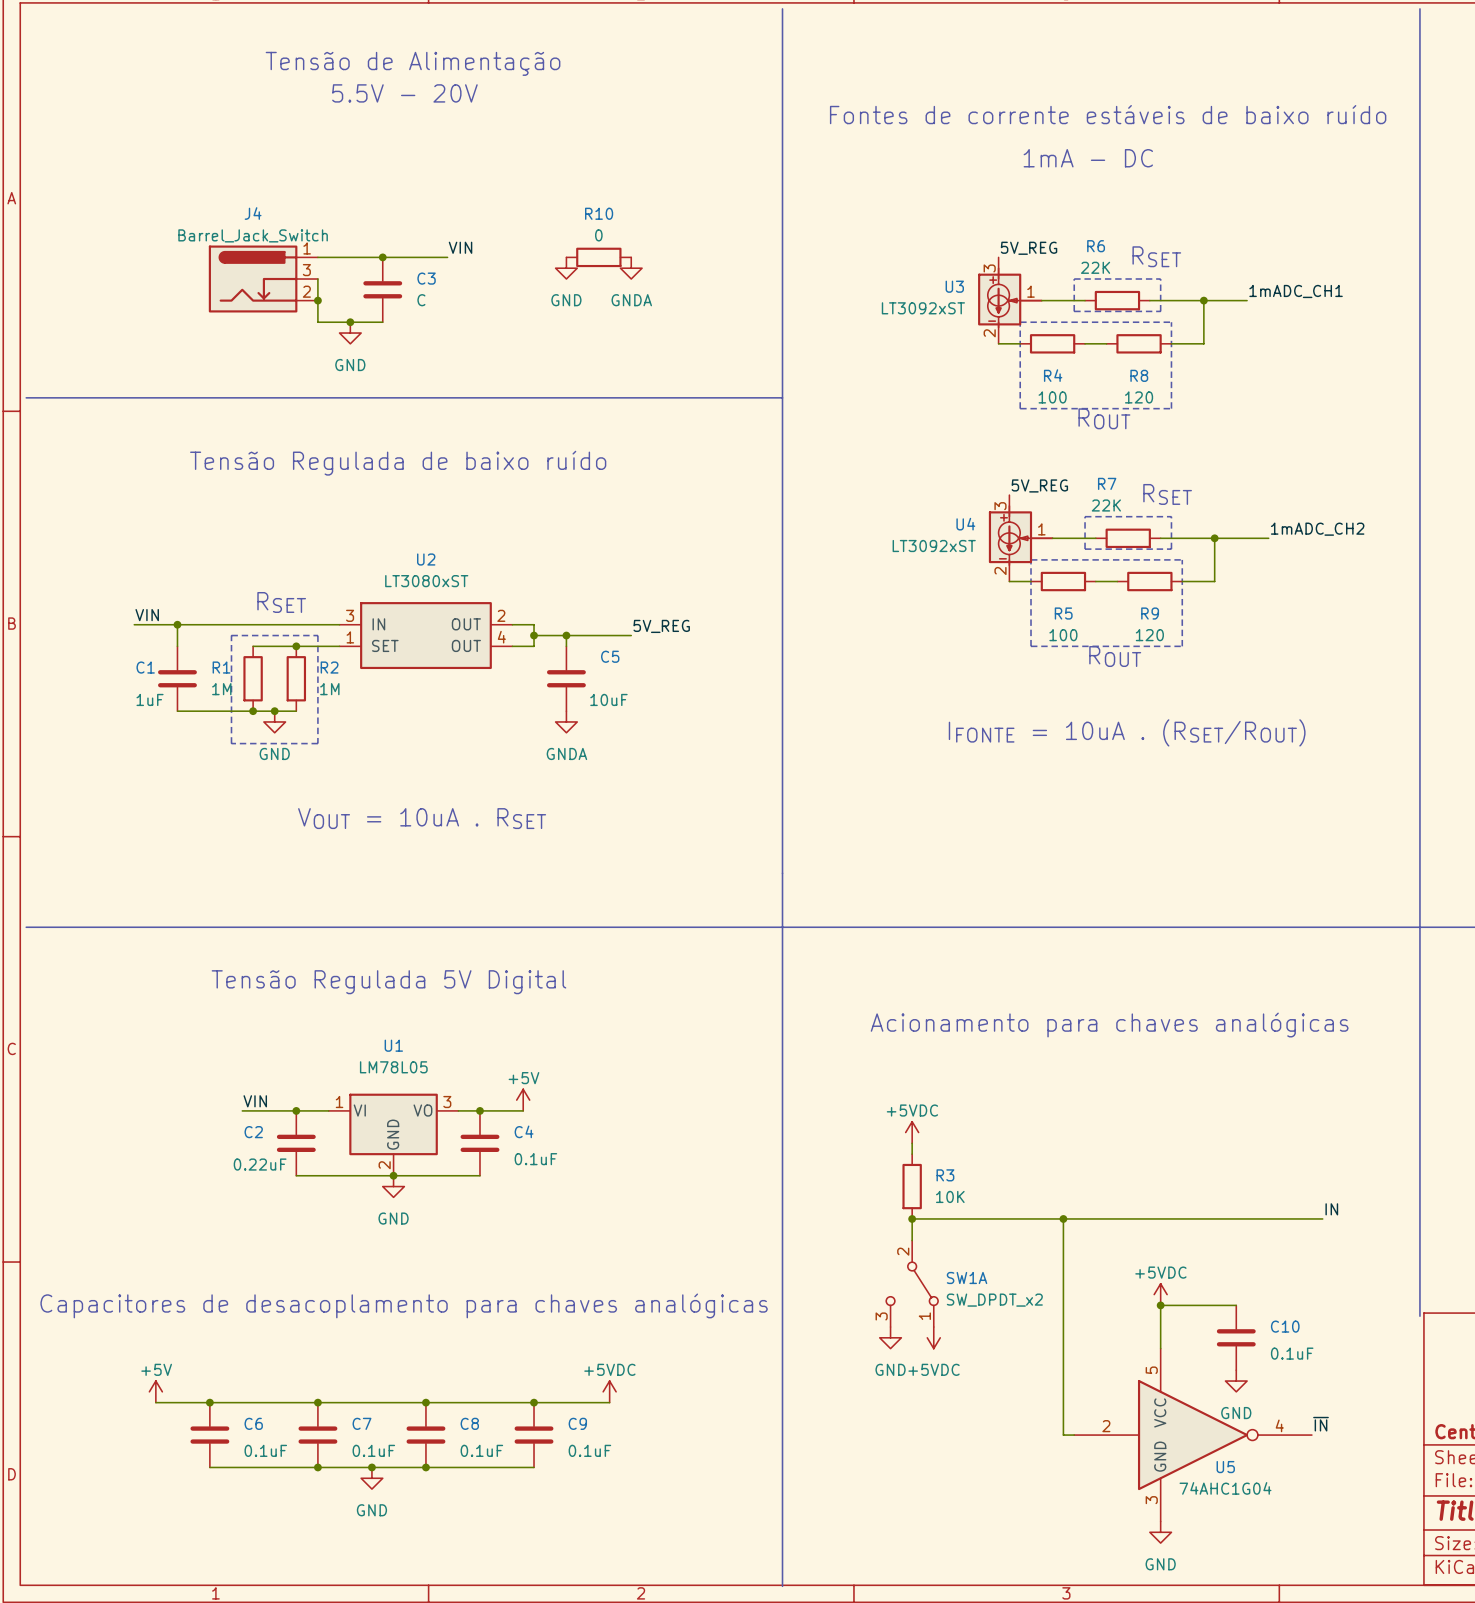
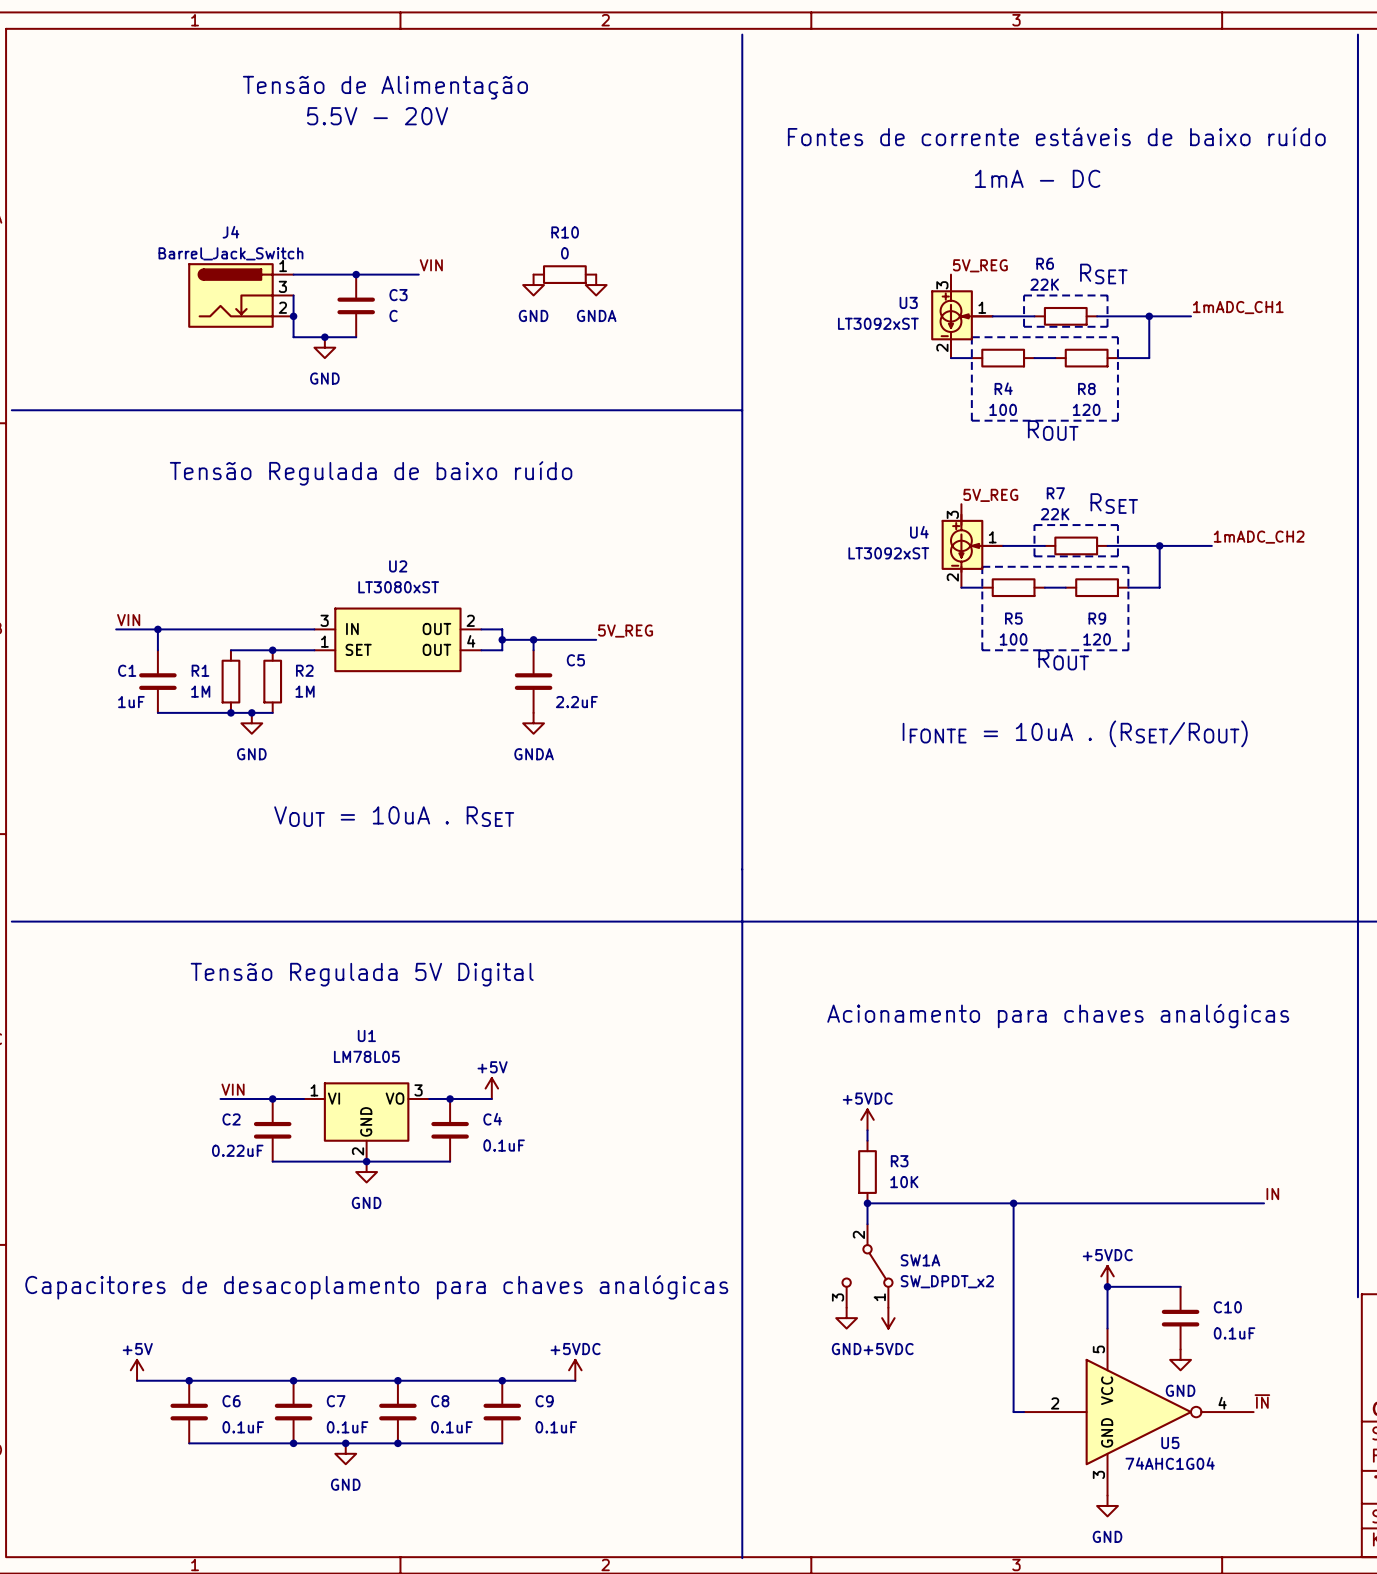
text: RSET (281, 602) -> none
line: (231, 635) (317, 635) (317, 743) (231, 743) (231, 635) -> none
C5 value: 10uF (608, 699) -> 2.2uF (576, 702)

